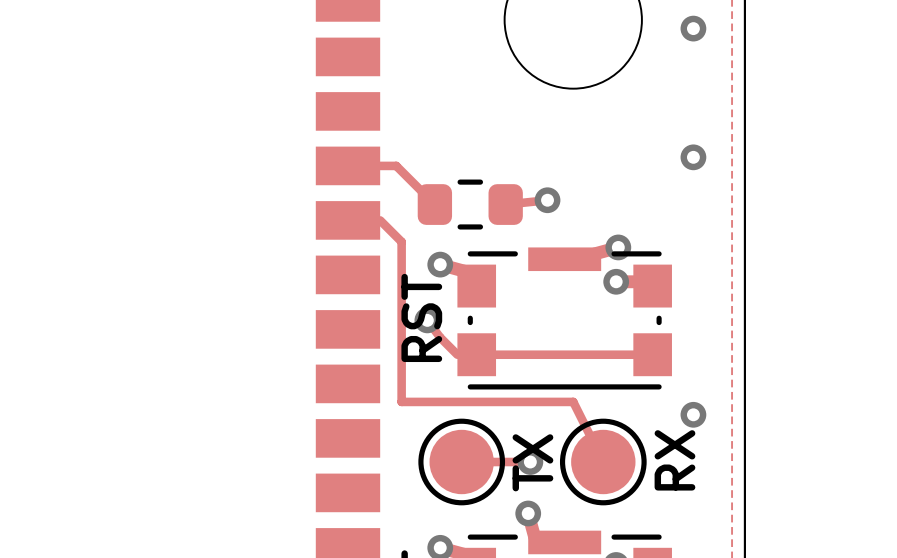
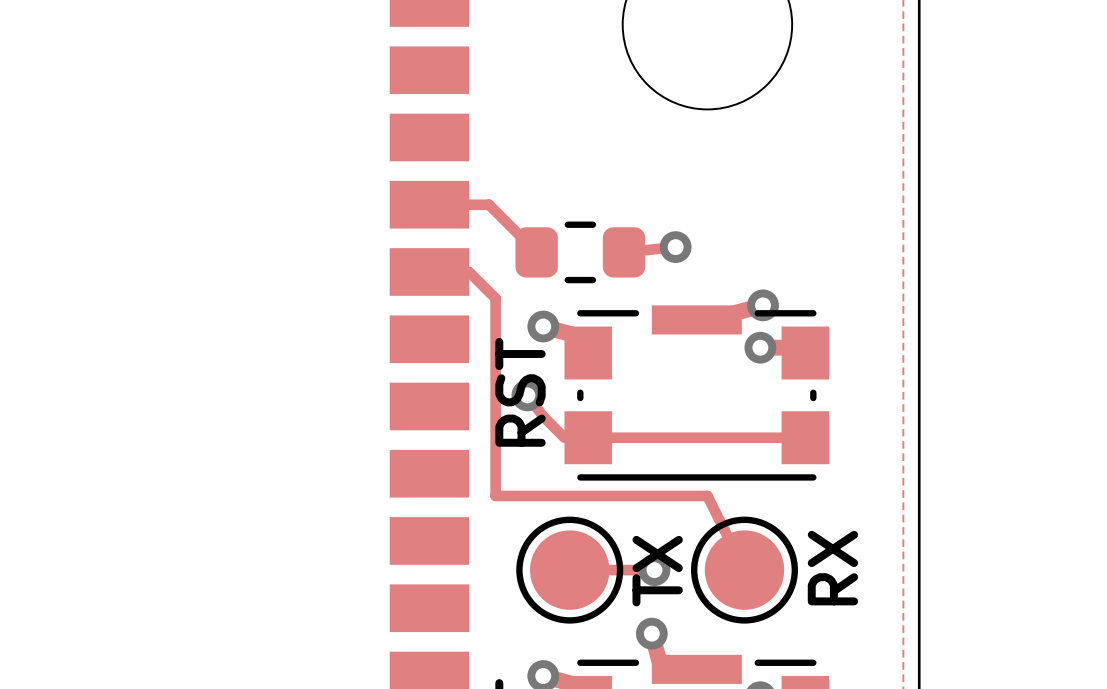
via: (693, 28) -> none
via: (693, 157) -> none
via: (693, 414) -> none

